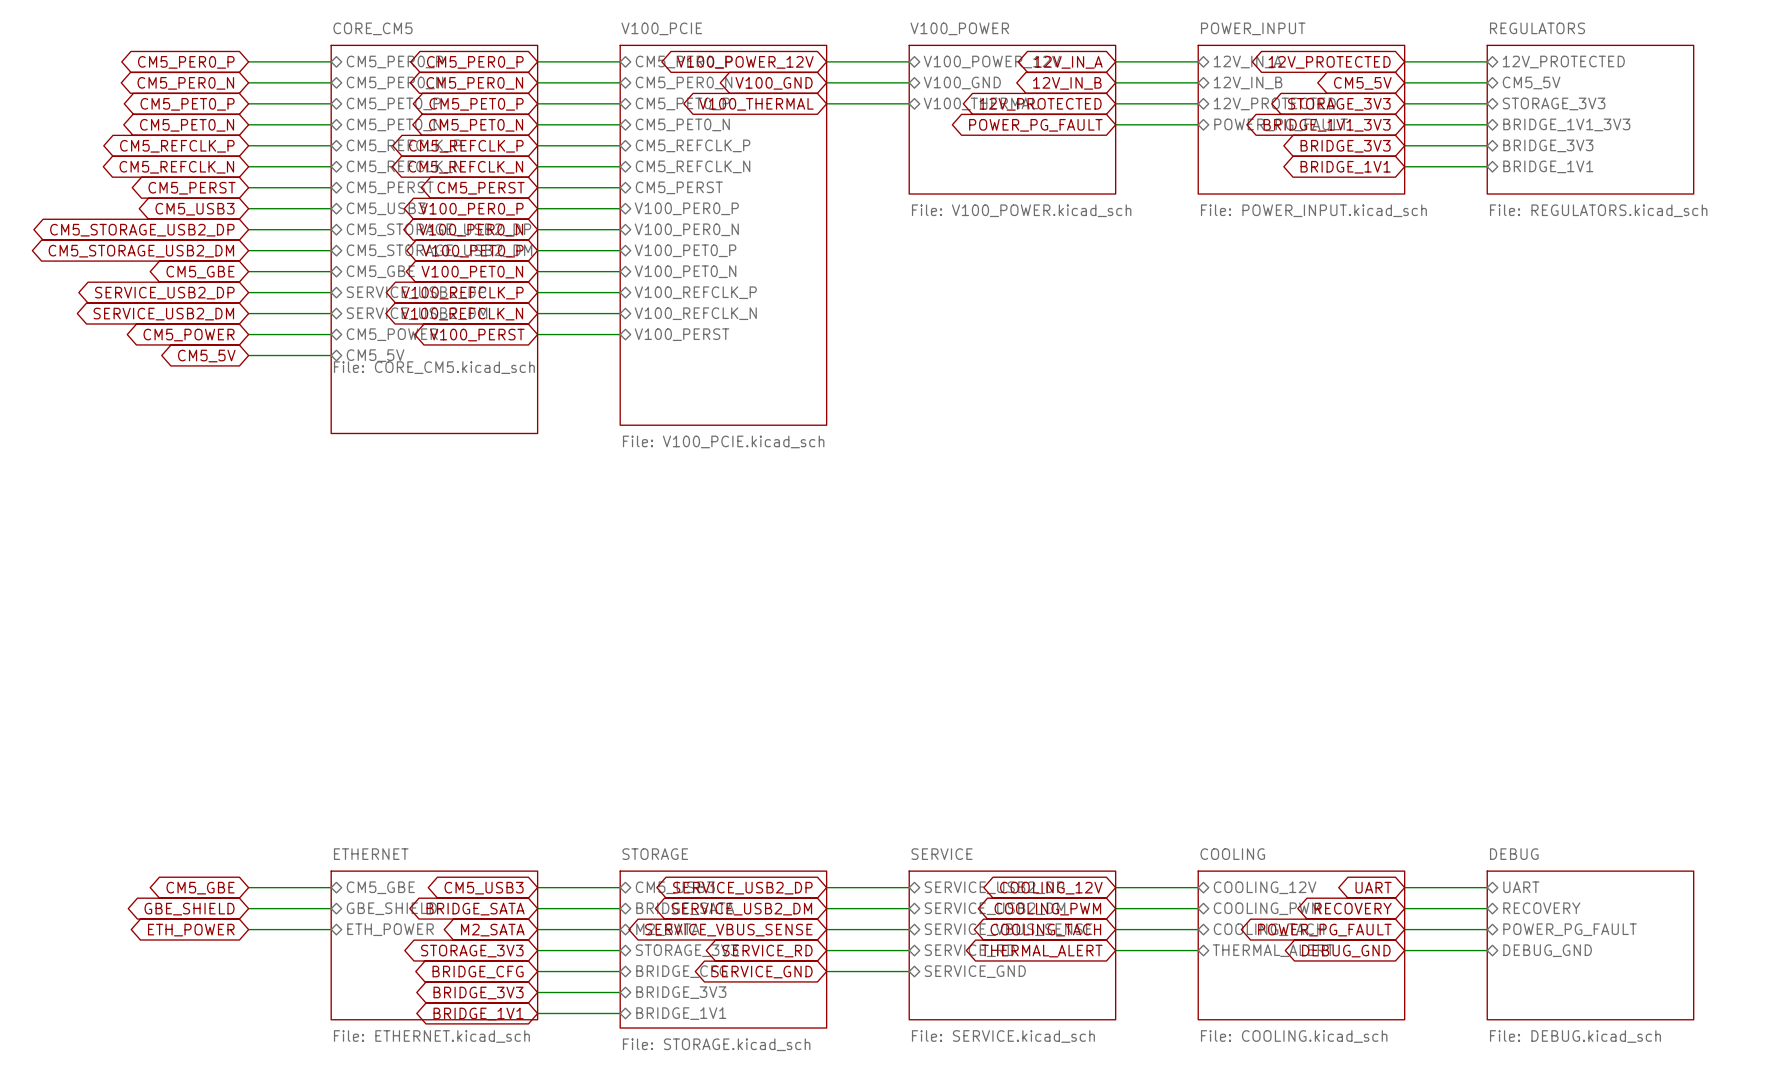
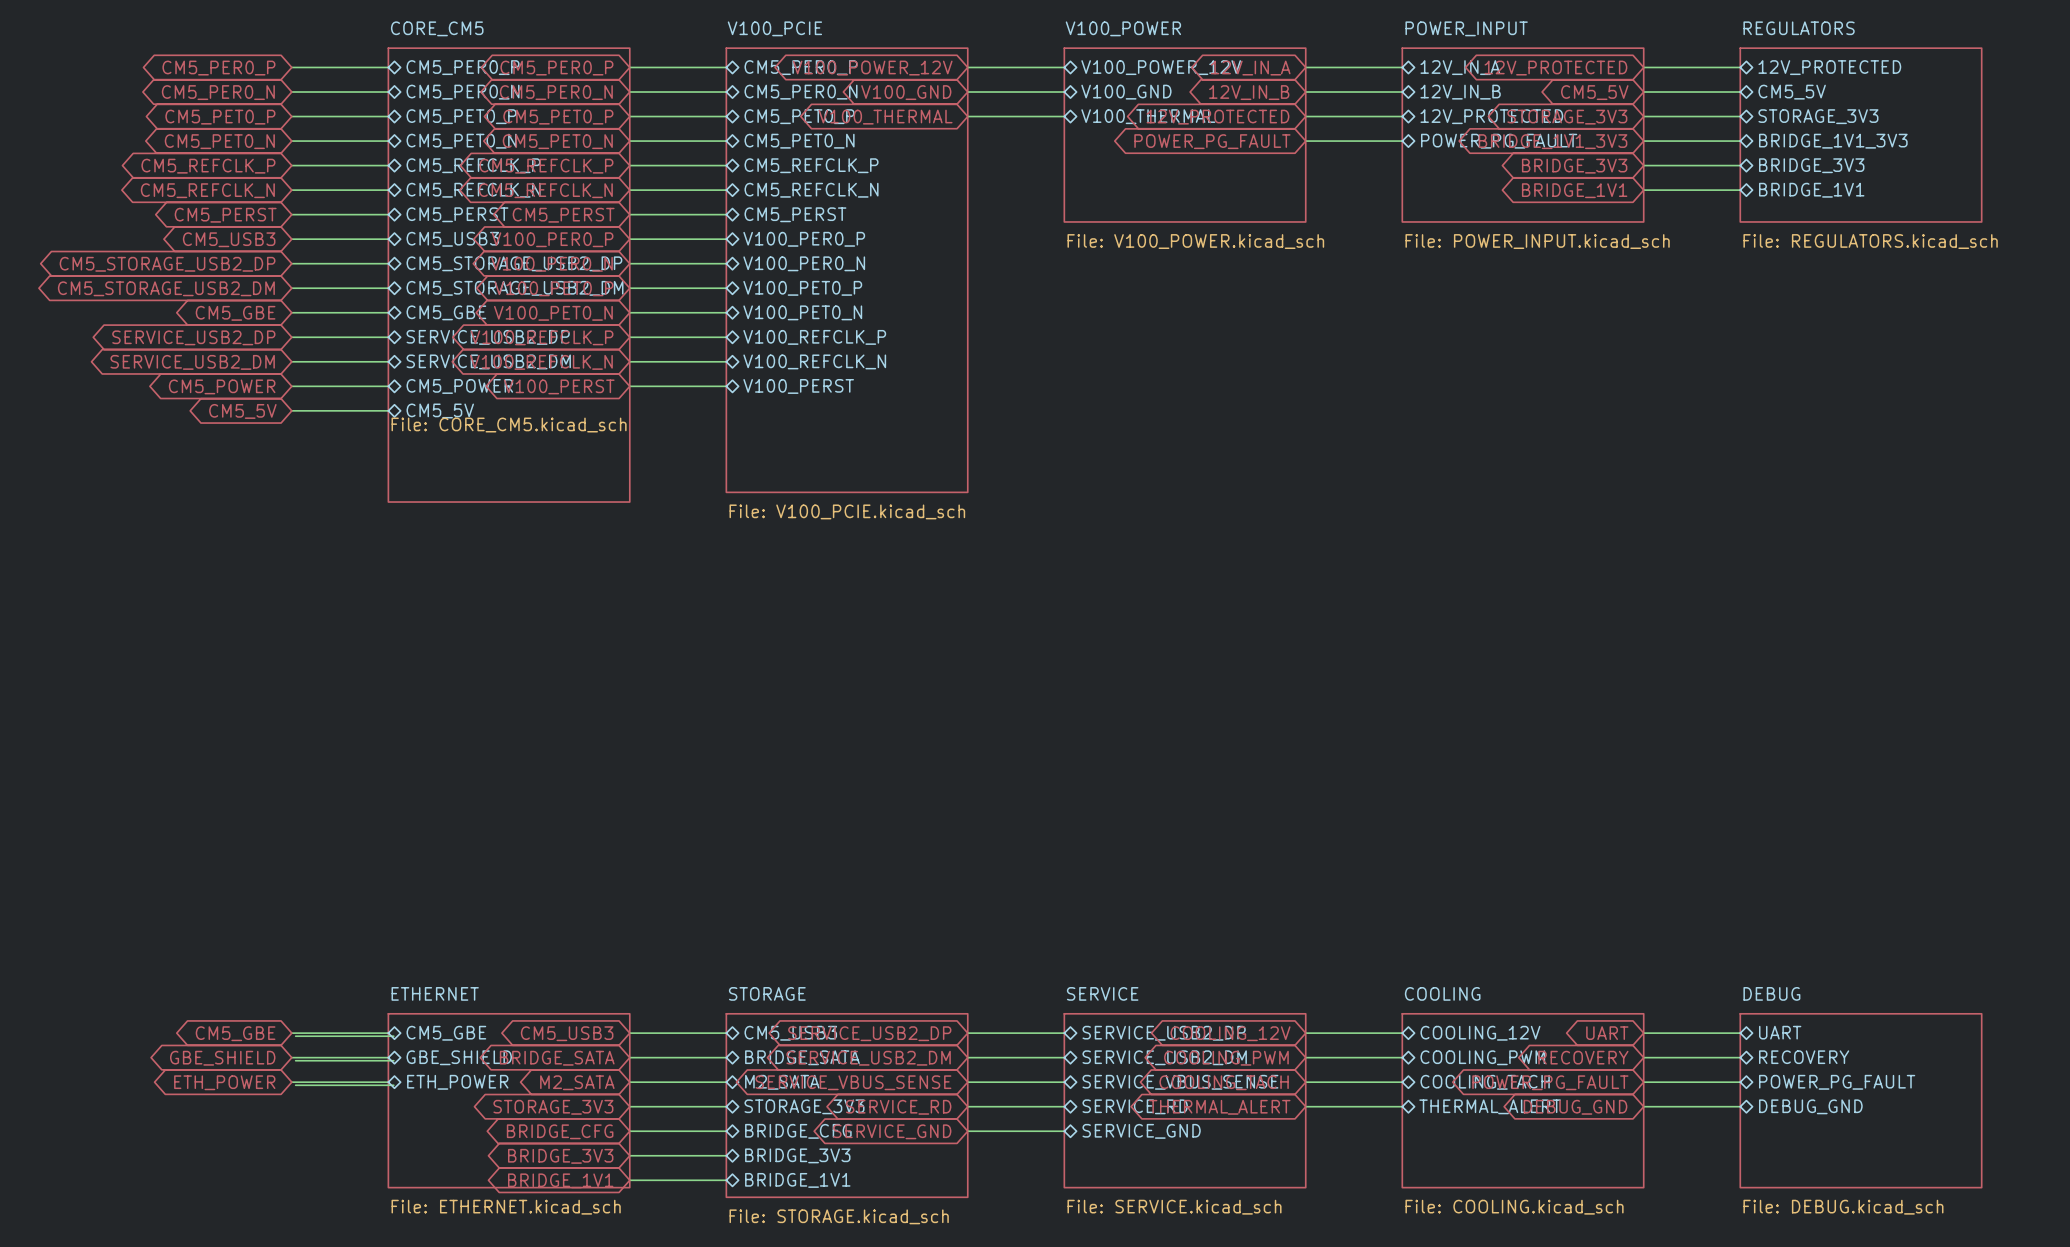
wire: none -> (295, 1036) (393, 1036)
wire: none -> (295, 1060) (393, 1060)
wire: none -> (295, 1085) (393, 1085)

